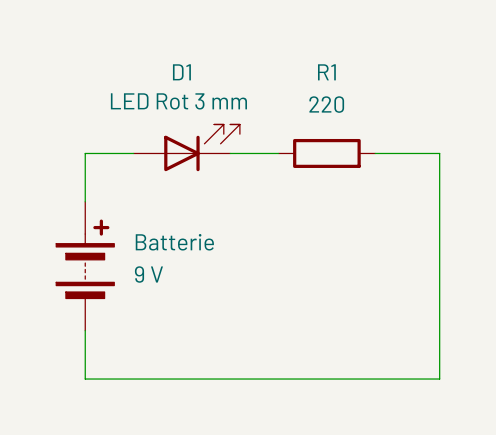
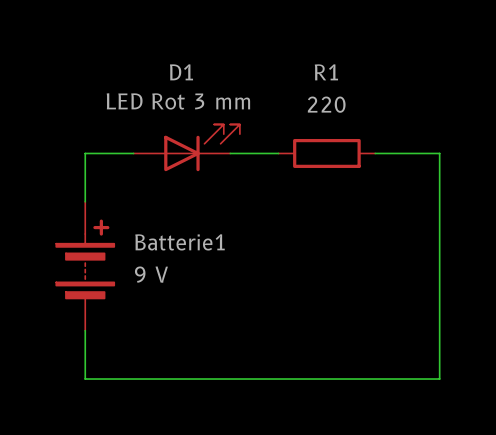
Batterie name: Batterie (174, 242) -> Batterie1 (180, 242)

